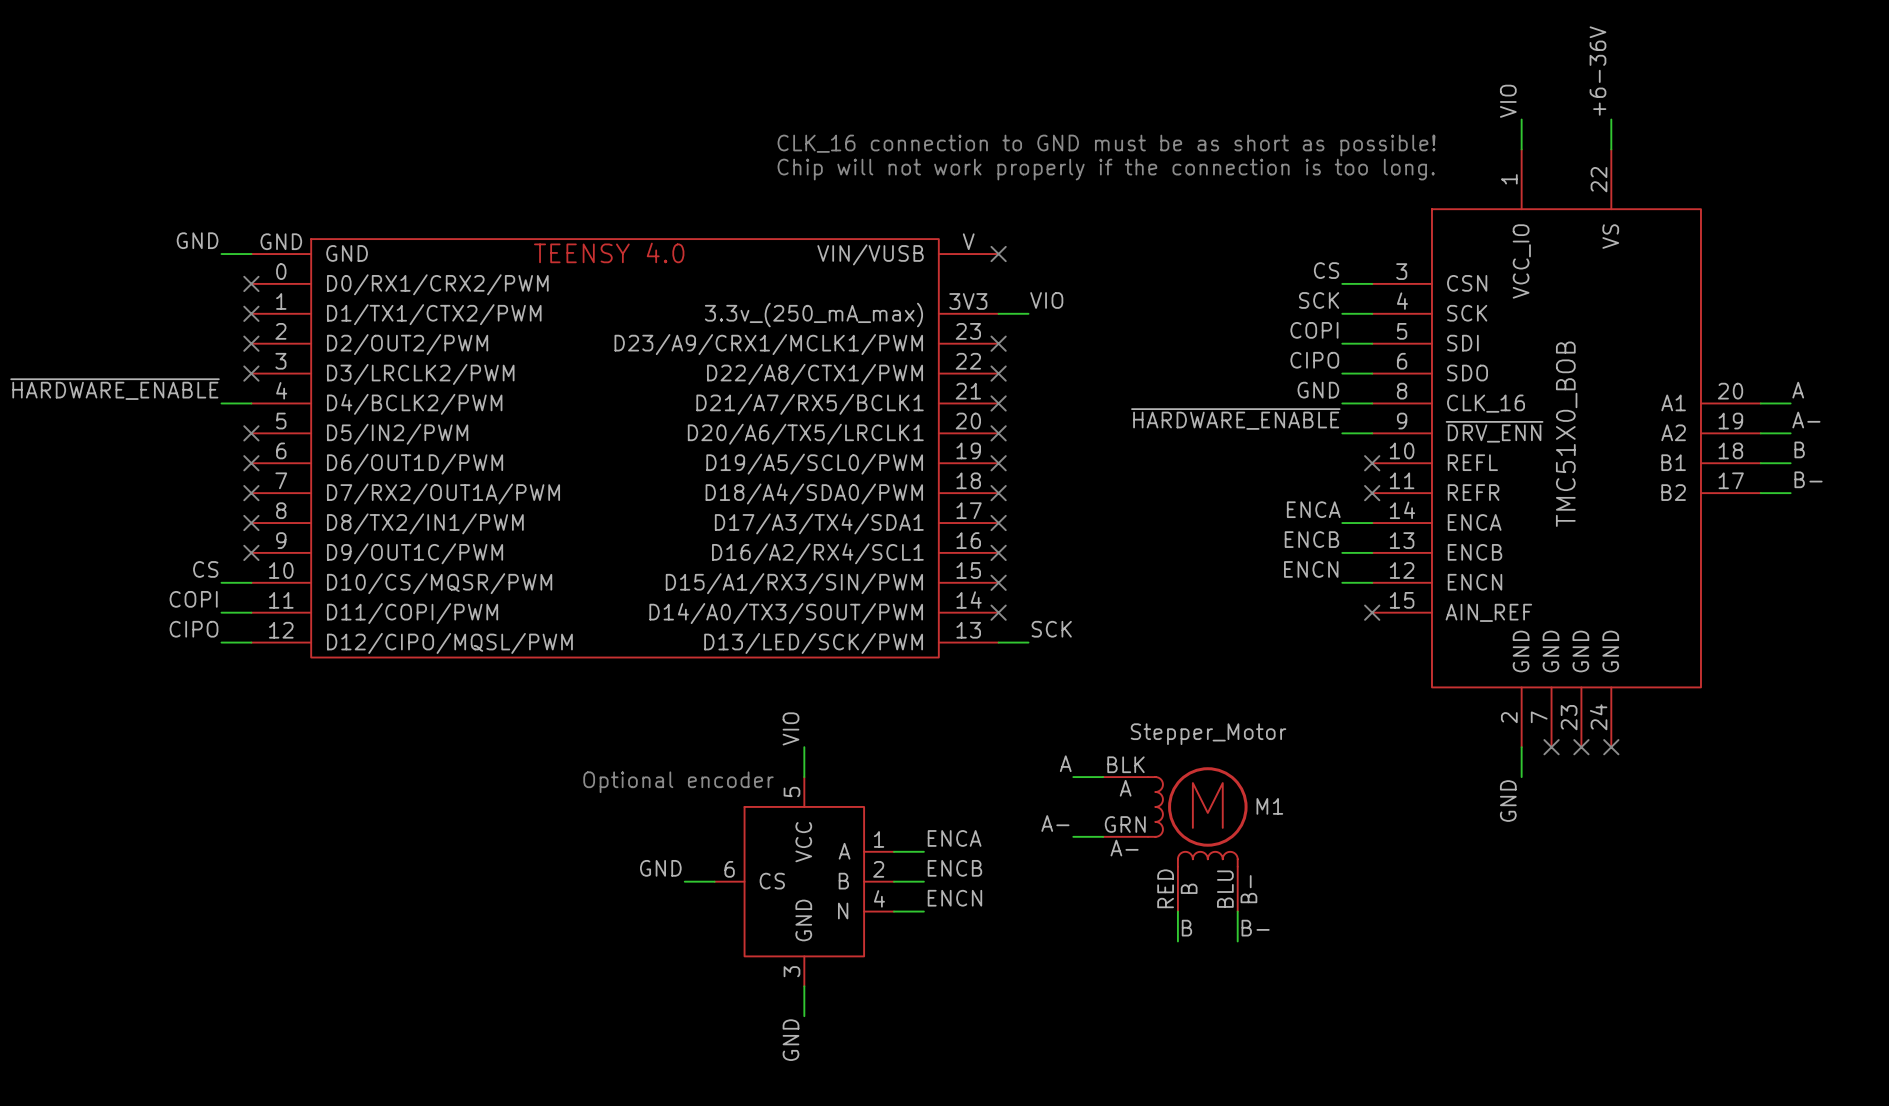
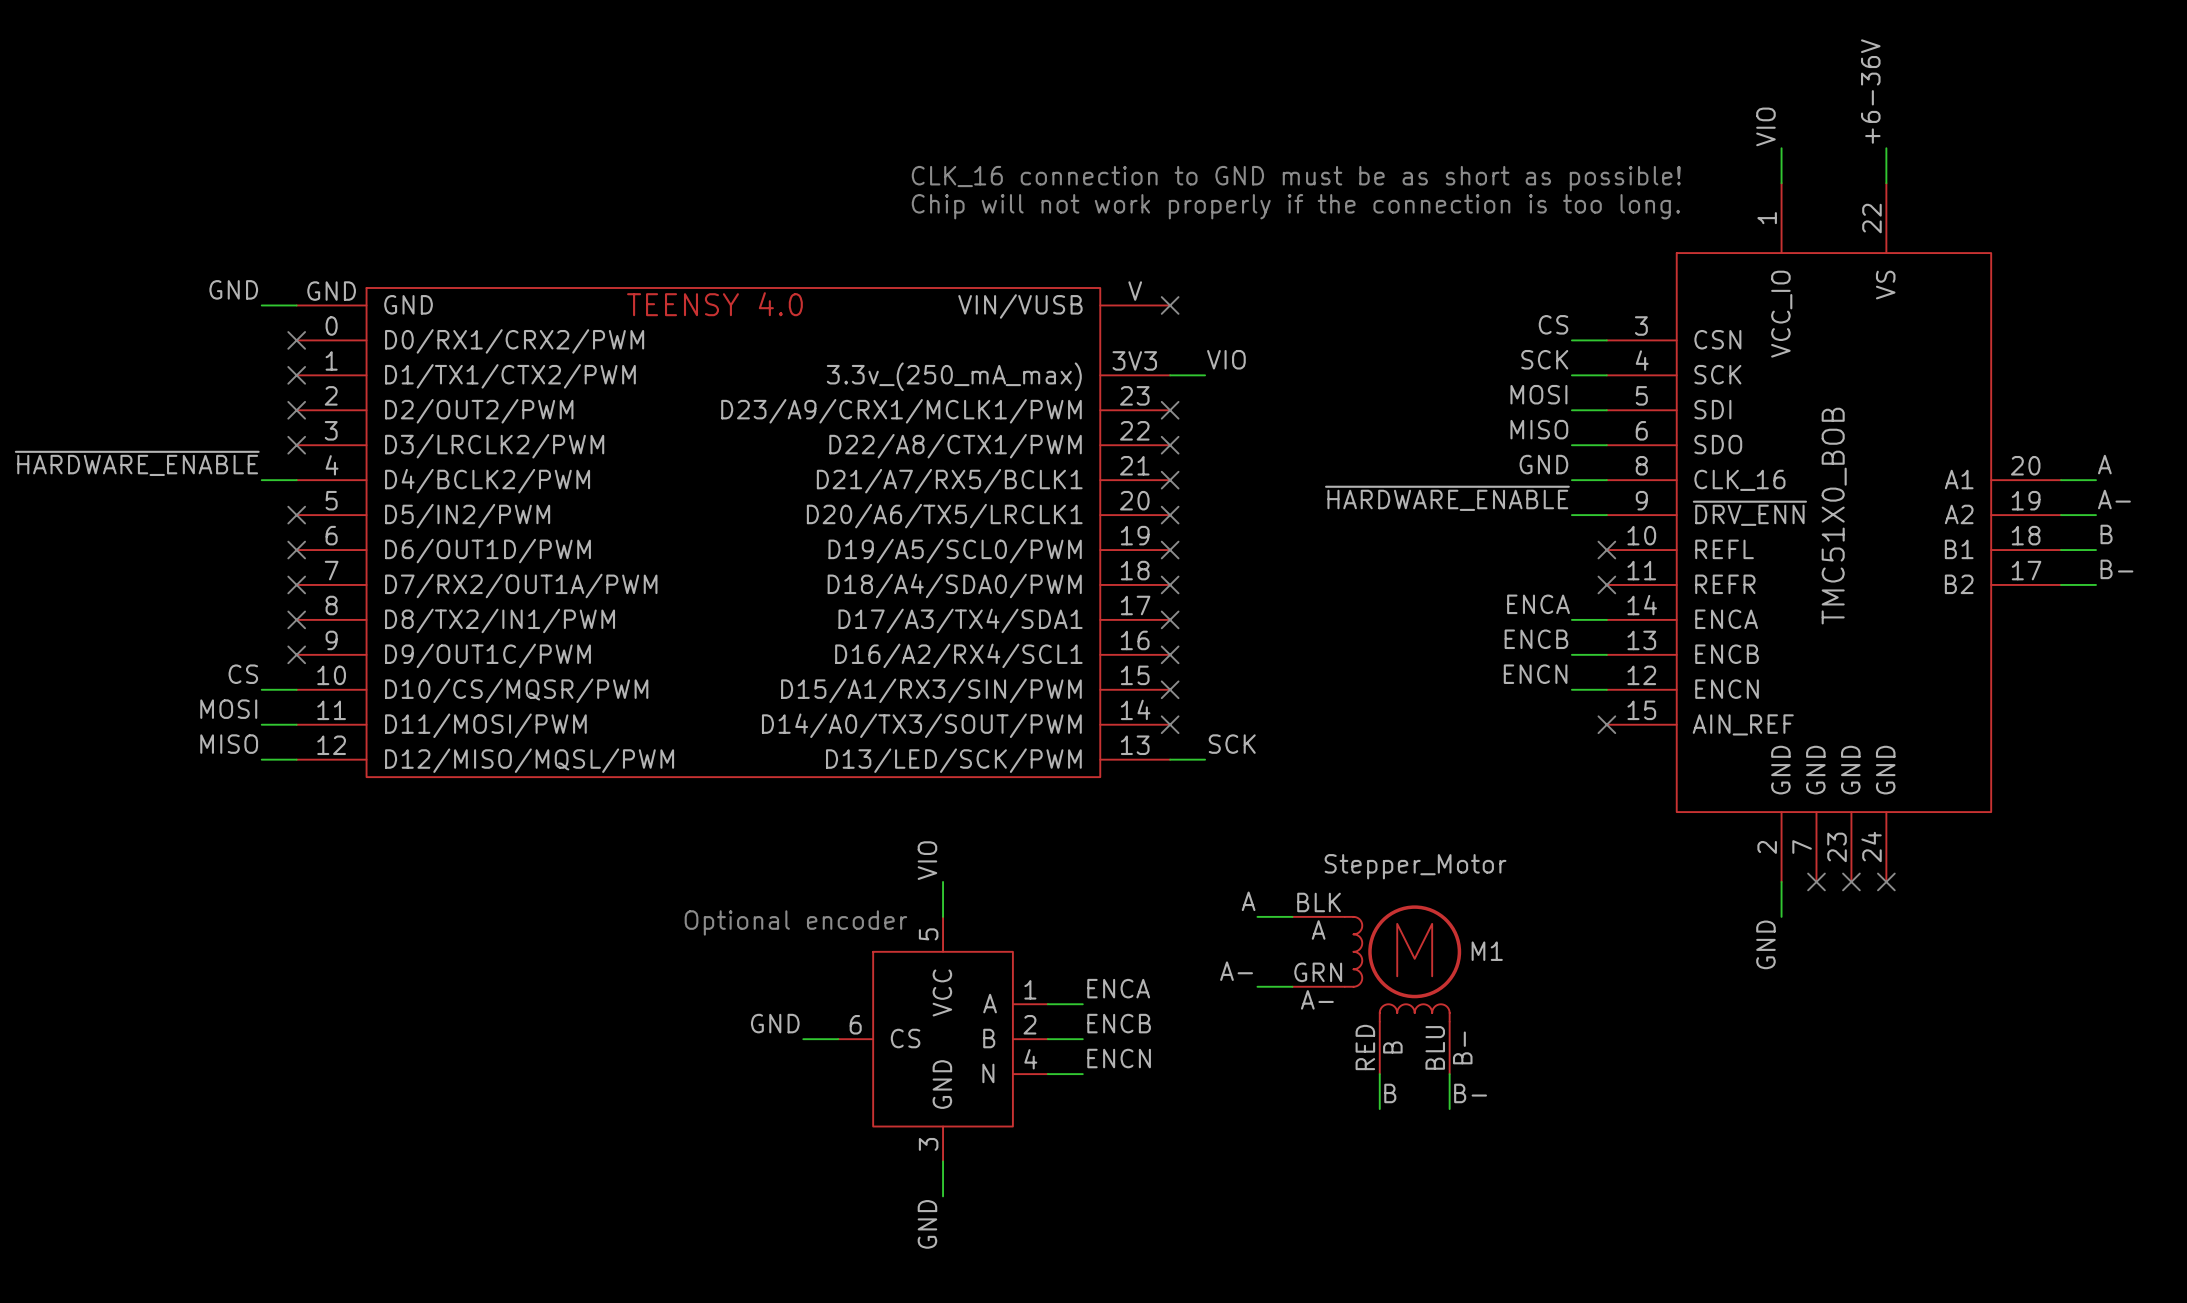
label: COPI (1314, 330) -> MOSI (1538, 394)
label: CIPO (1314, 360) -> MISO (1539, 429)
label: COPI (193, 599) -> MOSI (228, 709)
part pin name: D11/COPI/PWM (412, 613) -> D11/MOSI/PWM (485, 725)
label: CIPO (194, 629) -> MISO (229, 744)
part pin name: D12/CIPO/MQSL/PWM (449, 643) -> D12/MISO/MQSL/PWM (529, 760)

